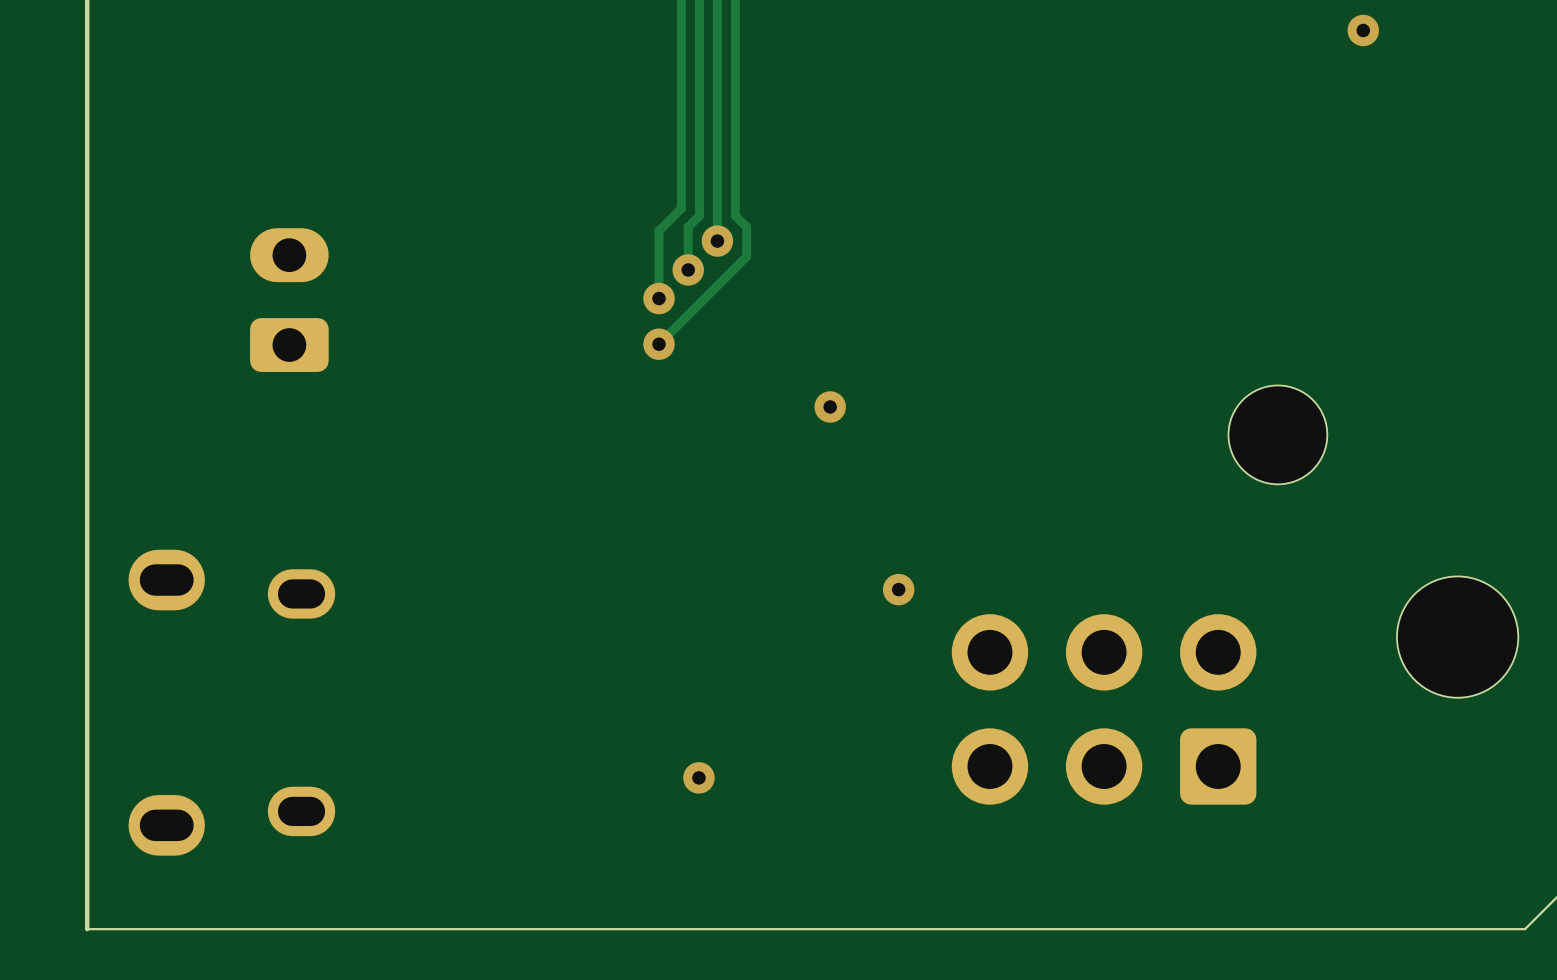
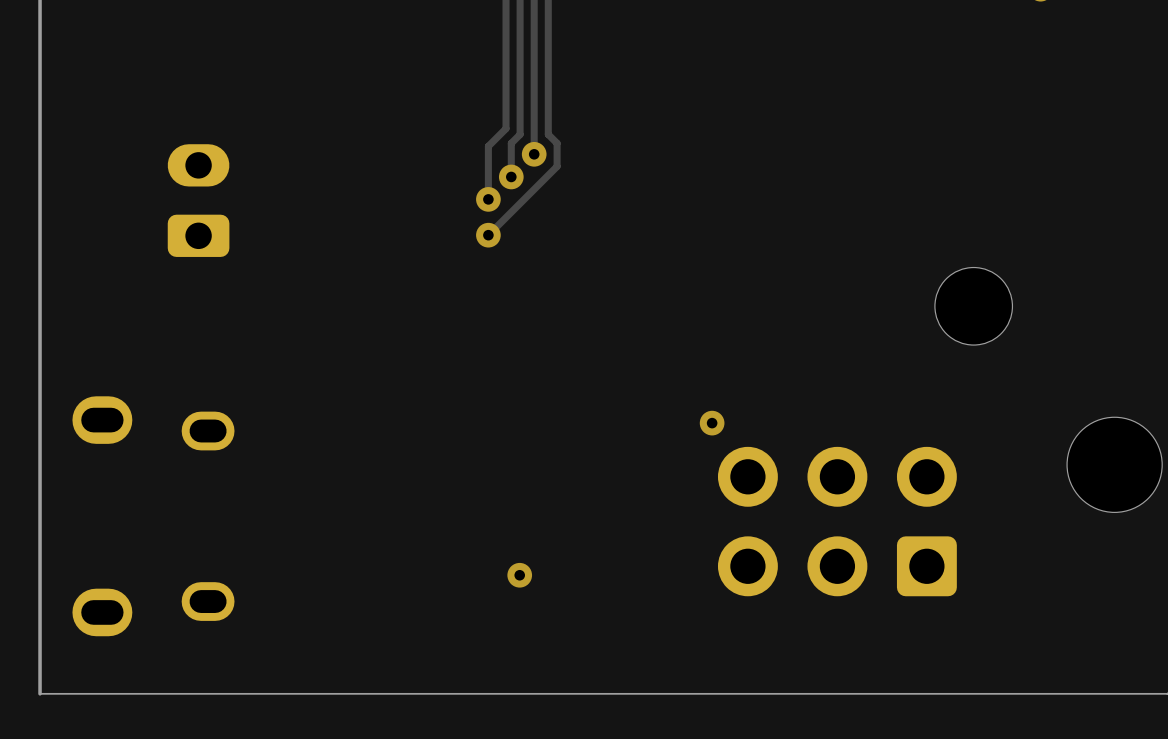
via: (830, 406) -> none
via position: (898, 589) -> (712, 423)

